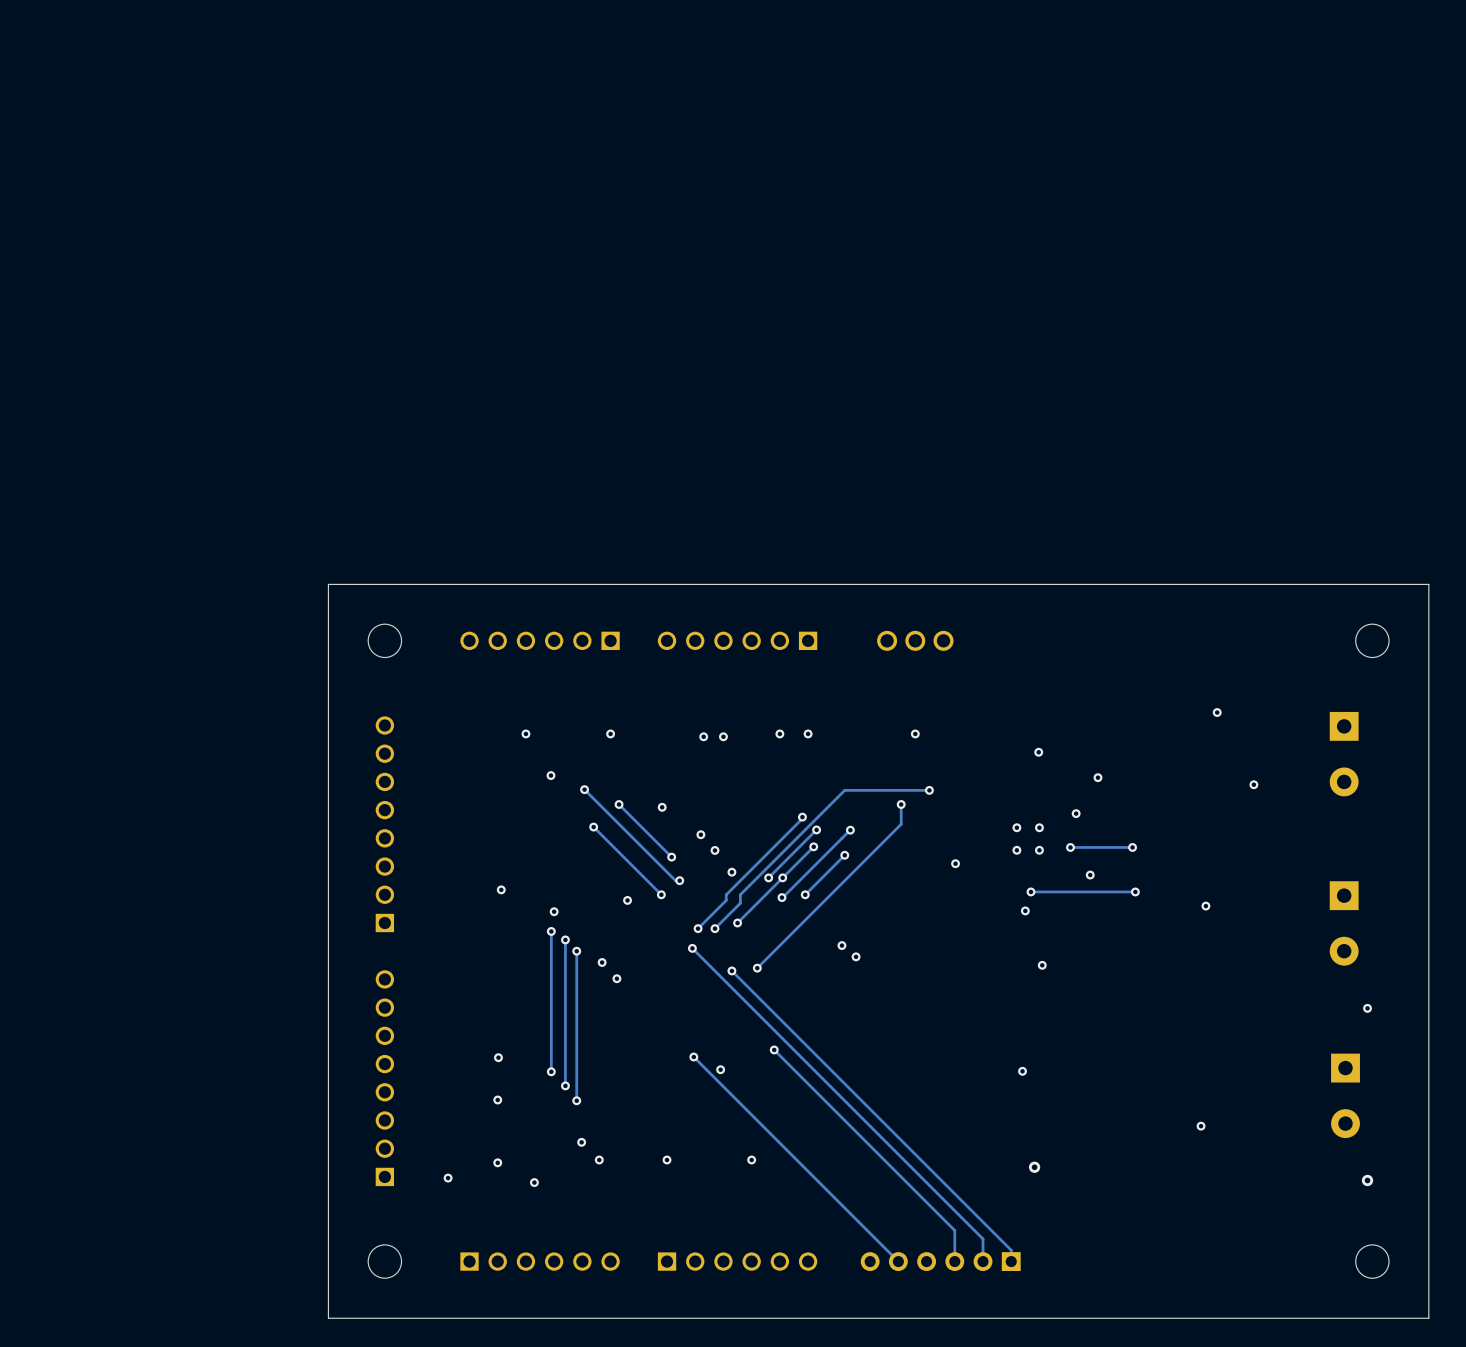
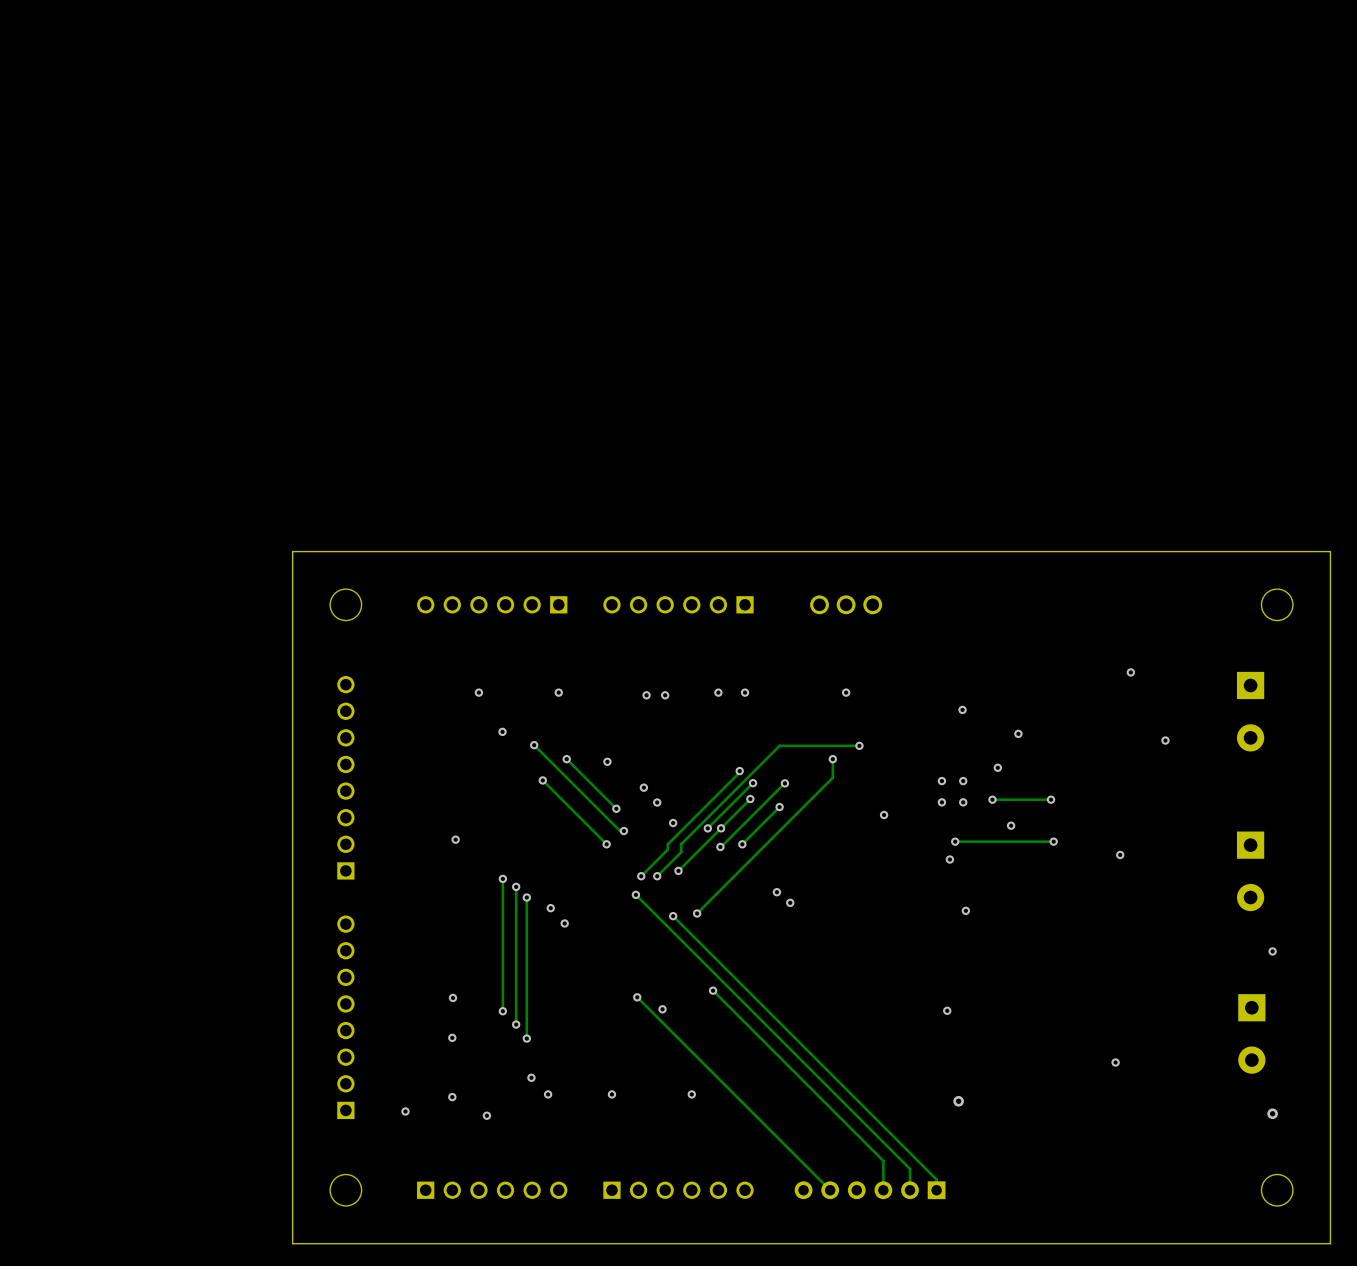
via: (627, 900) -> none
via: (554, 911) -> none

